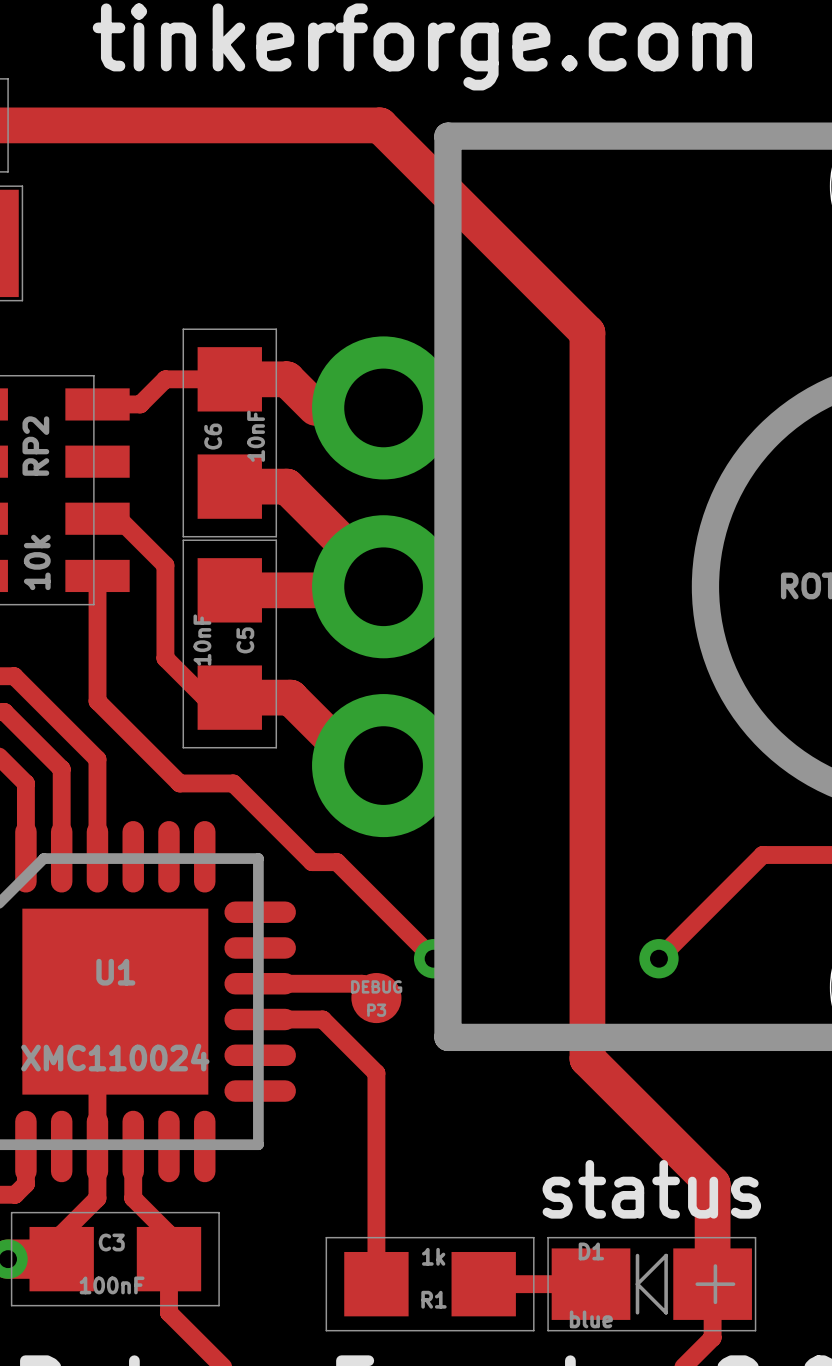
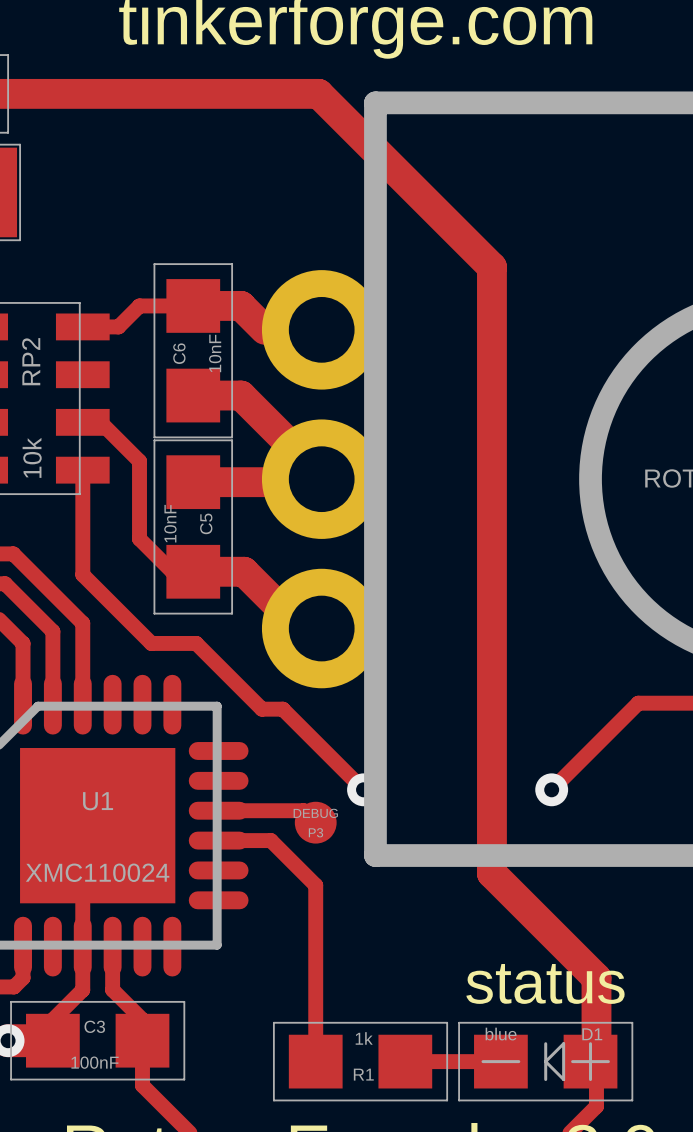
D1 footprint: [548, 1237, 756, 1331] -> [459, 1022, 633, 1101]
D1 name position: D1 (591, 1251) -> D1 (592, 1034)
D1 value position: blue (591, 1319) -> blue (501, 1034)

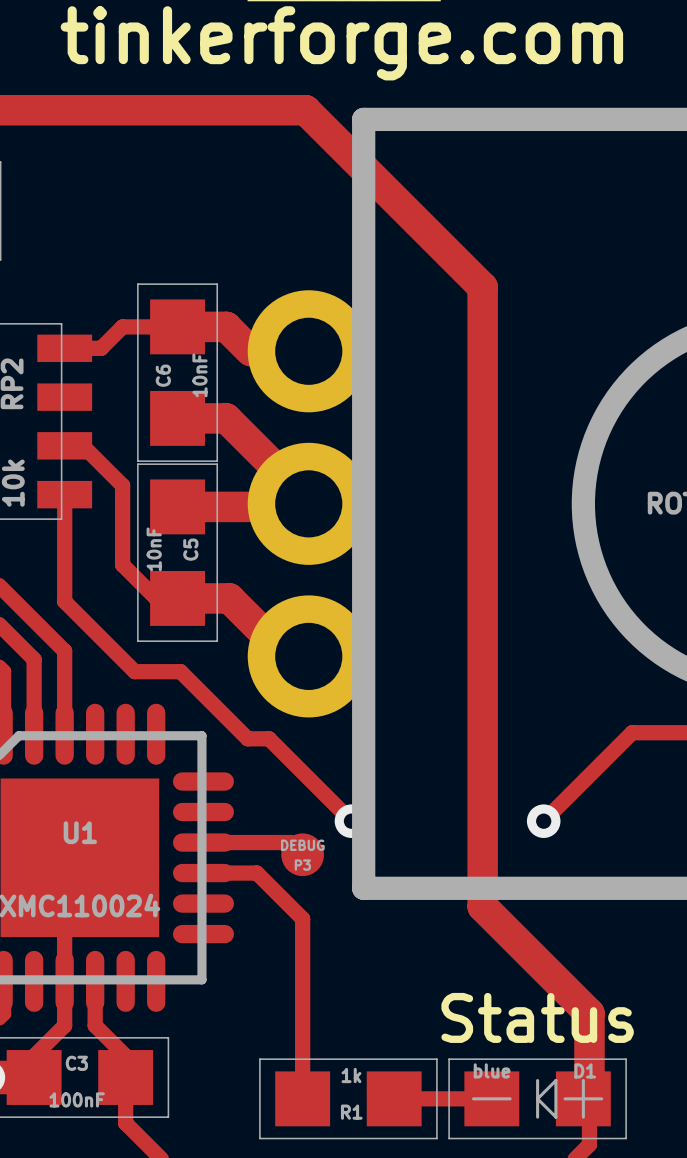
text: status (545, 983) -> Status (537, 1017)

